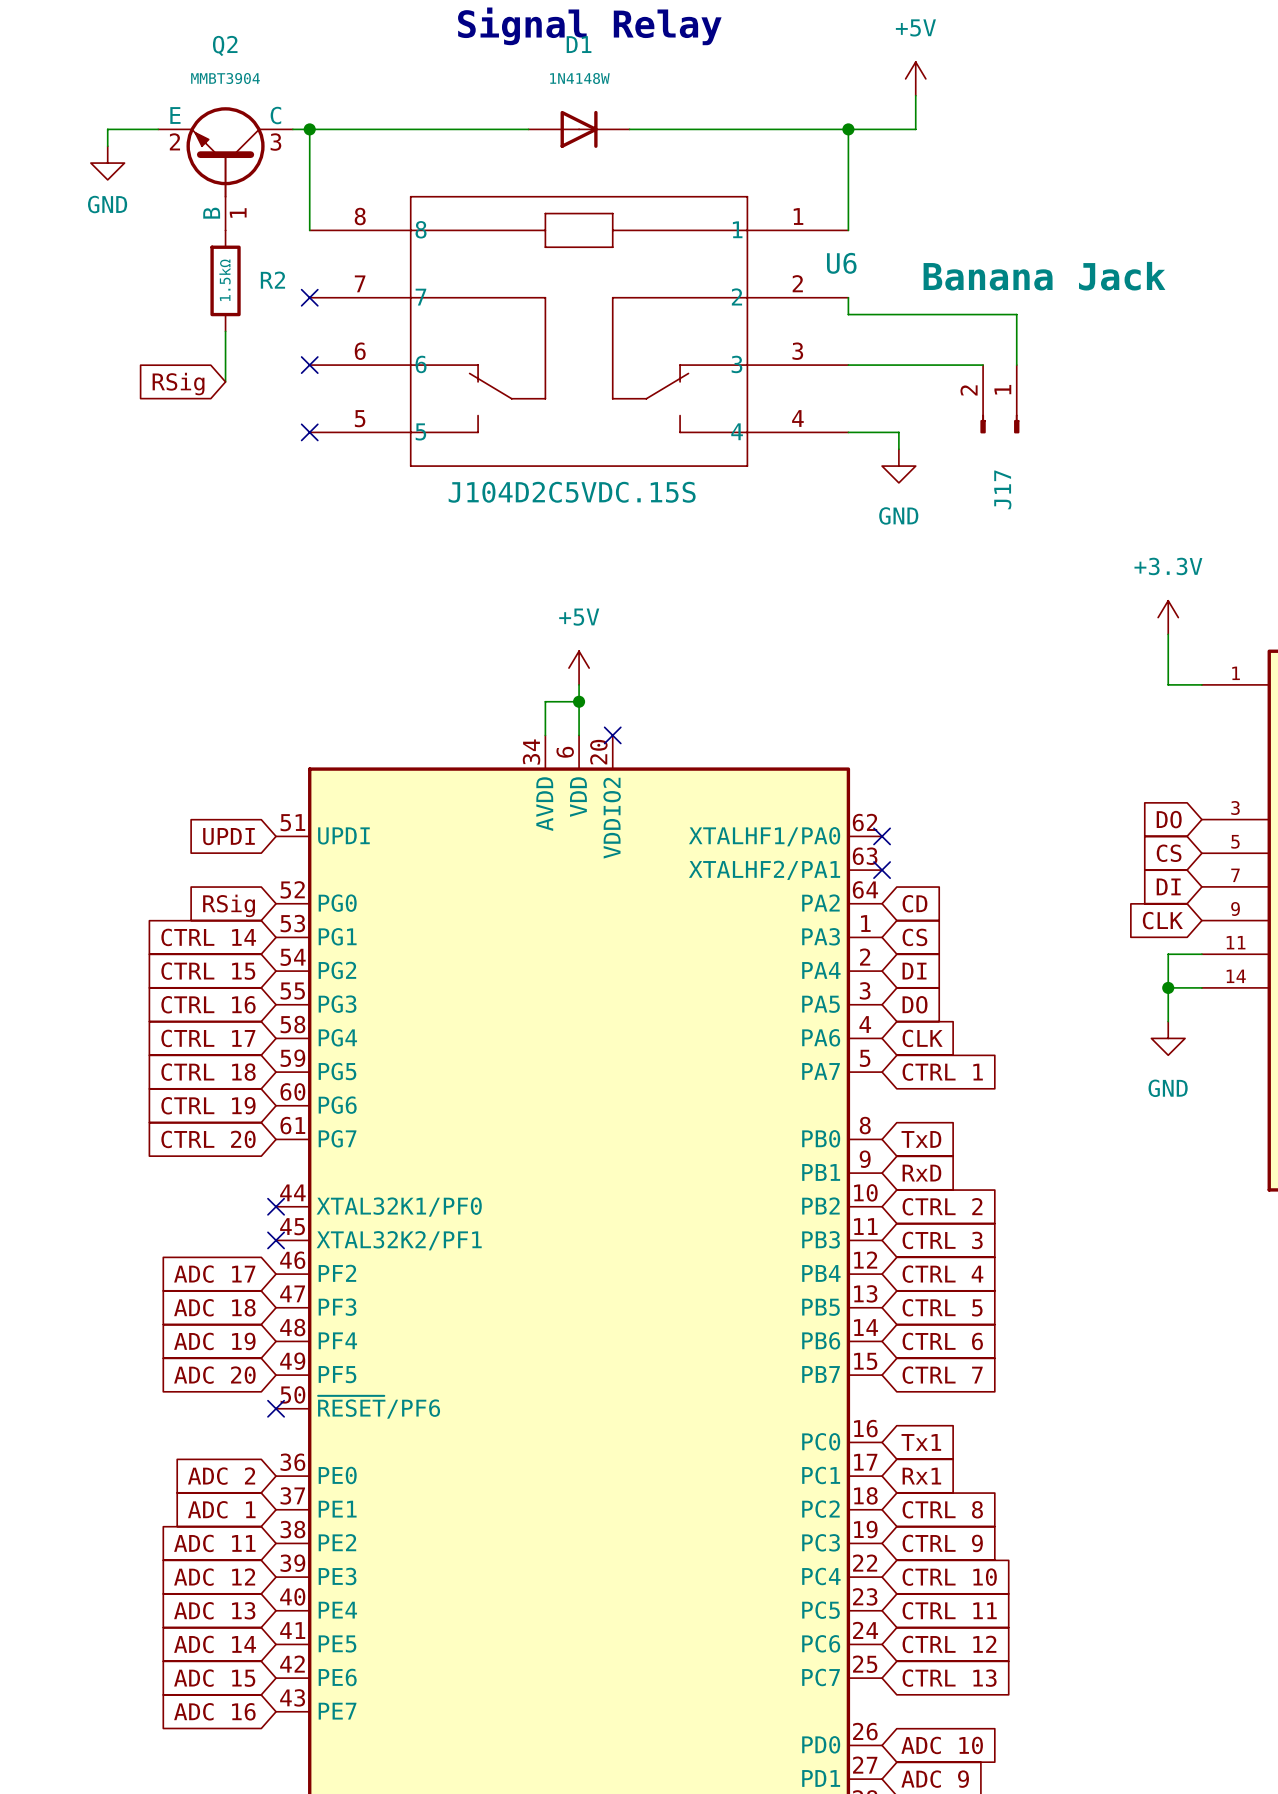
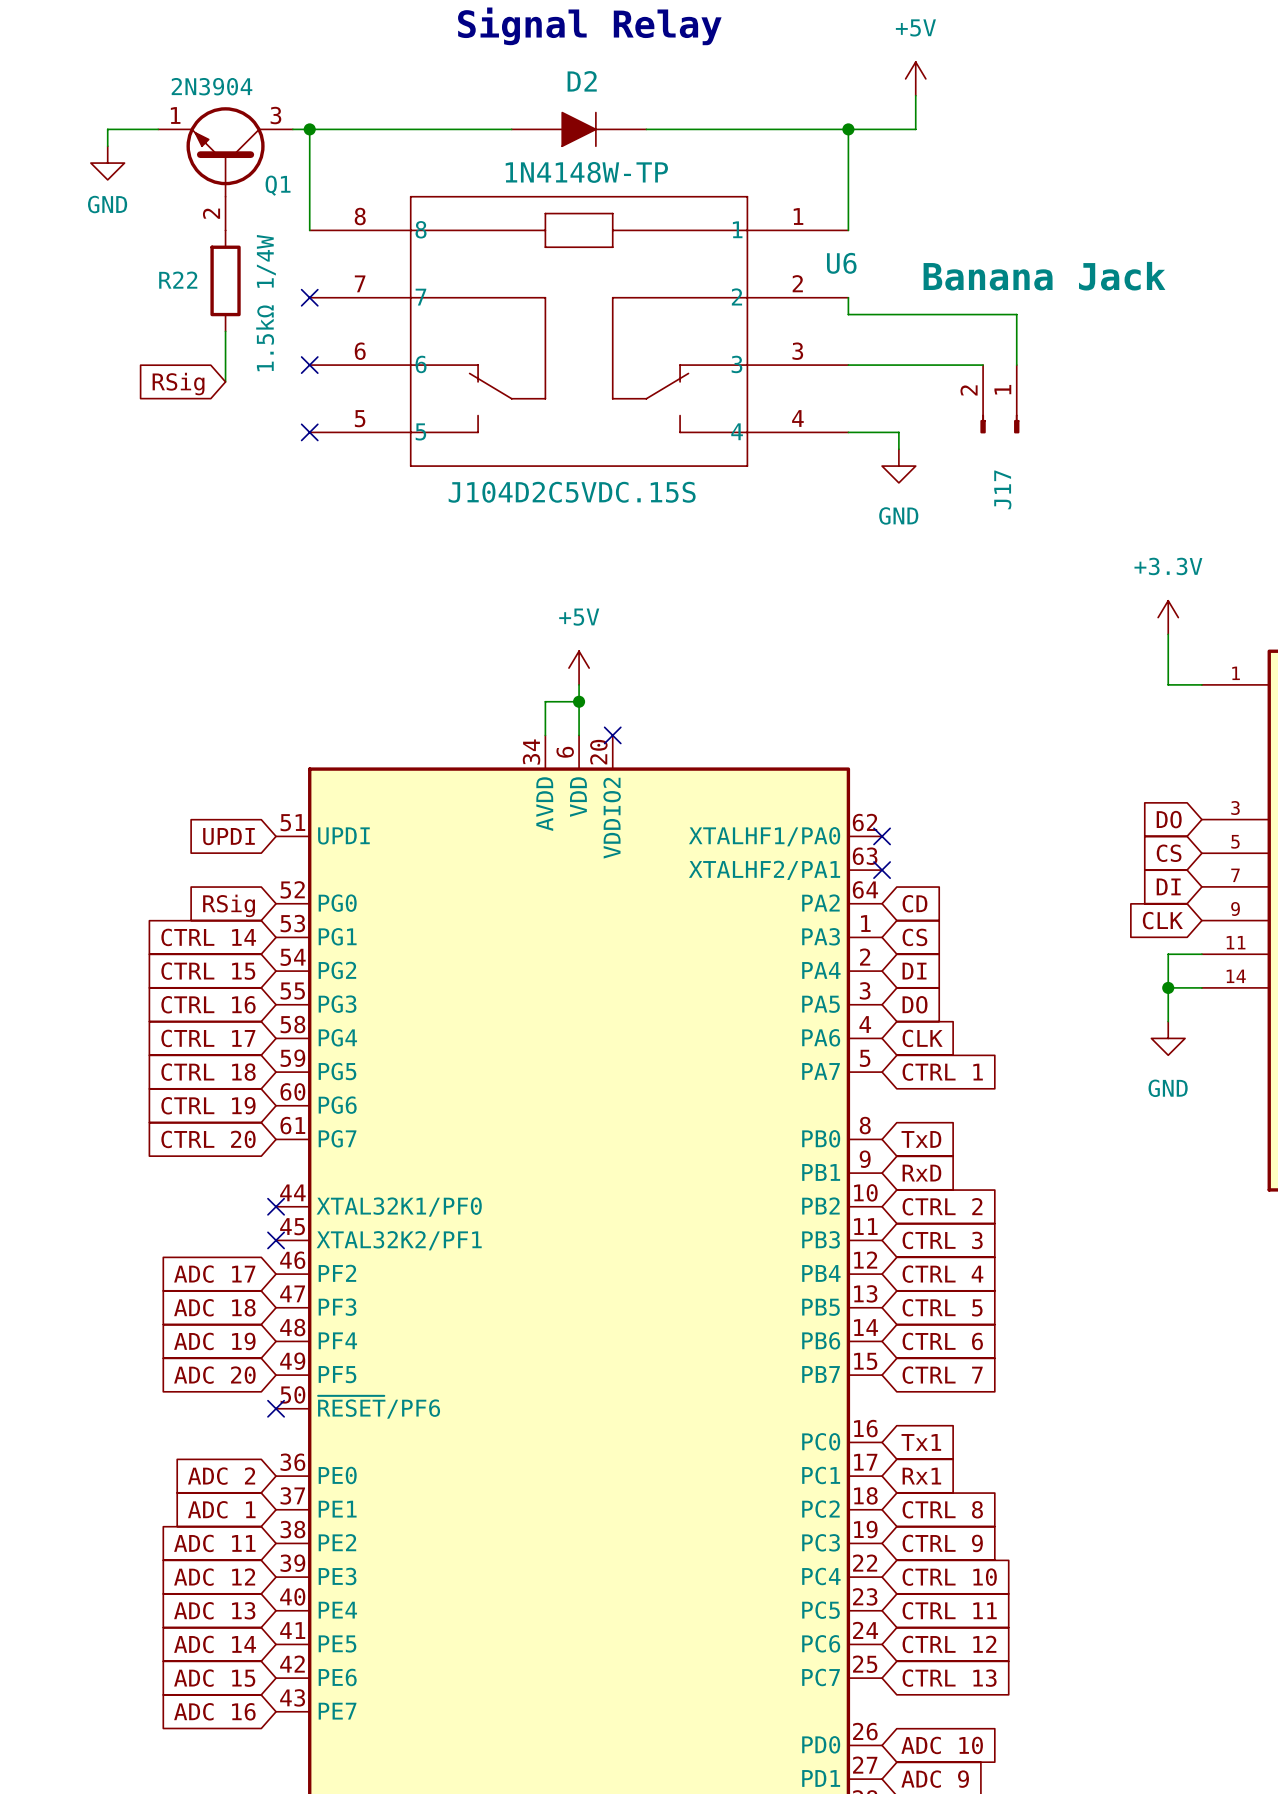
D1: 1N4148W (579, 129) -> none
D2: none -> 1N4148W-TP (579, 129)
Q2: MMBT3904 (225, 168) -> none
Q1: none -> 2N3904 (225, 168)
R2 value: 1.5kΩ (225, 280) -> 1.5kΩ 1/4W (266, 303)
R2 name: R2 (272, 280) -> R22 (178, 280)

